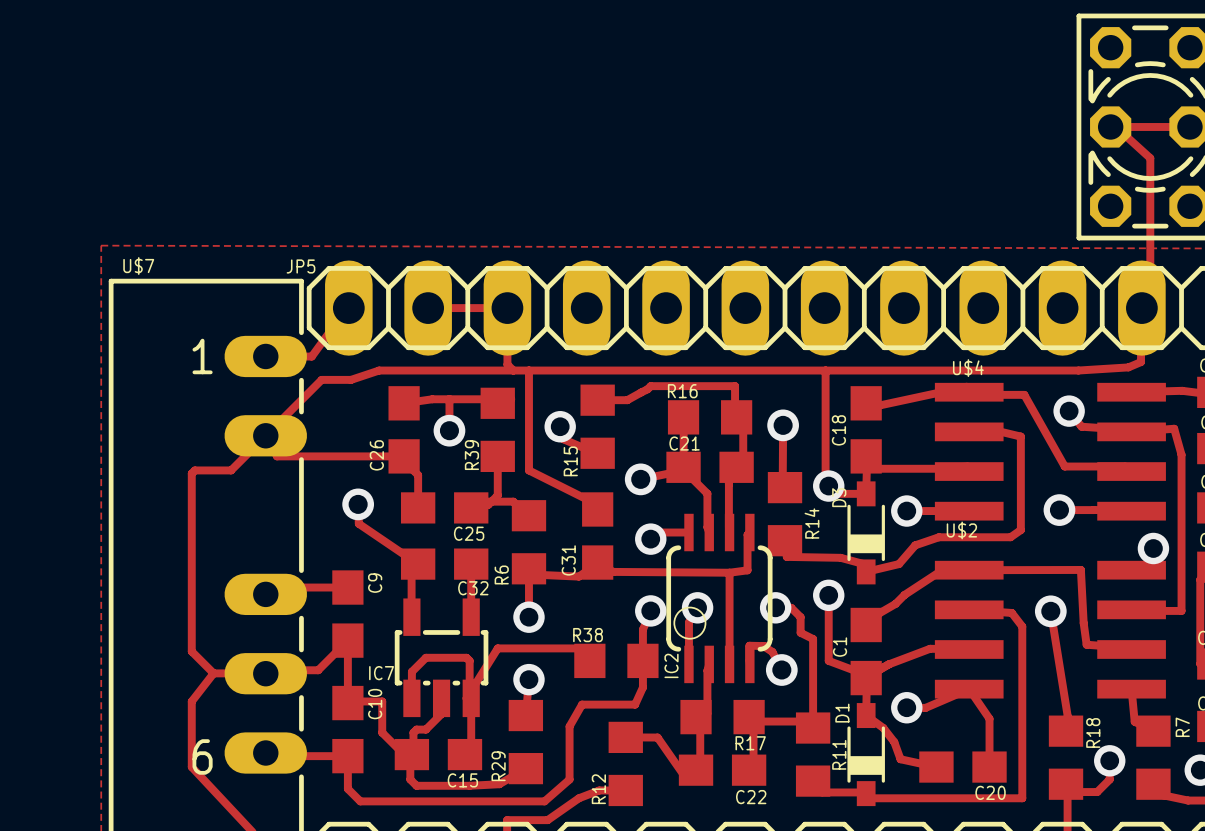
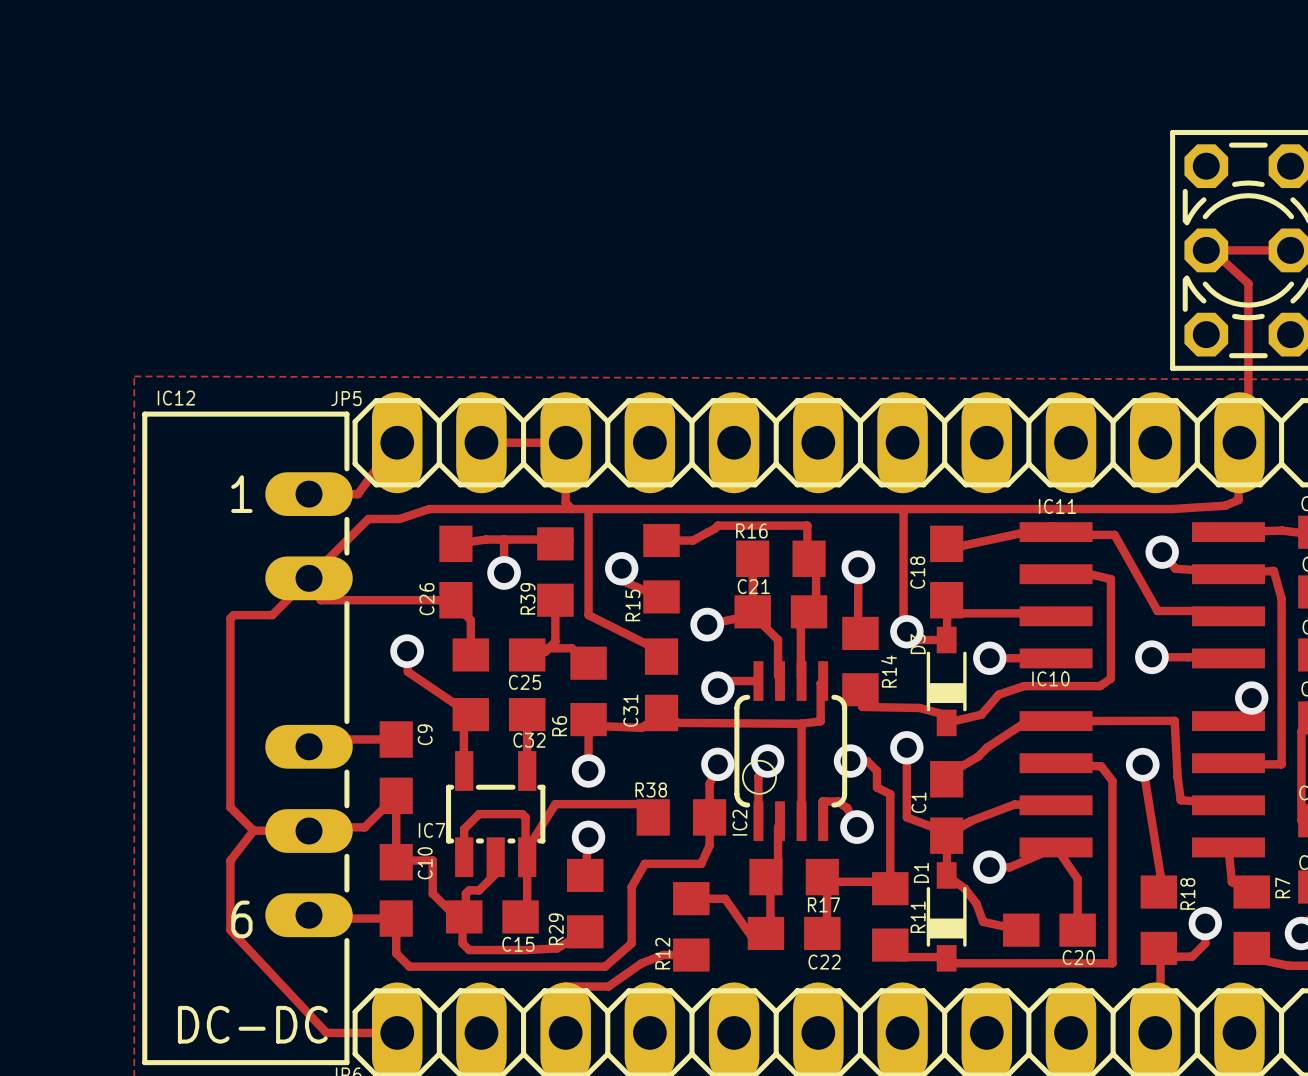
U$7 name: U$7 (138, 266) -> IC12 (176, 398)
U$4 name: U$4 (968, 368) -> IC11 (1057, 506)
U$2 name: U$2 (961, 530) -> IC10 (1050, 678)

